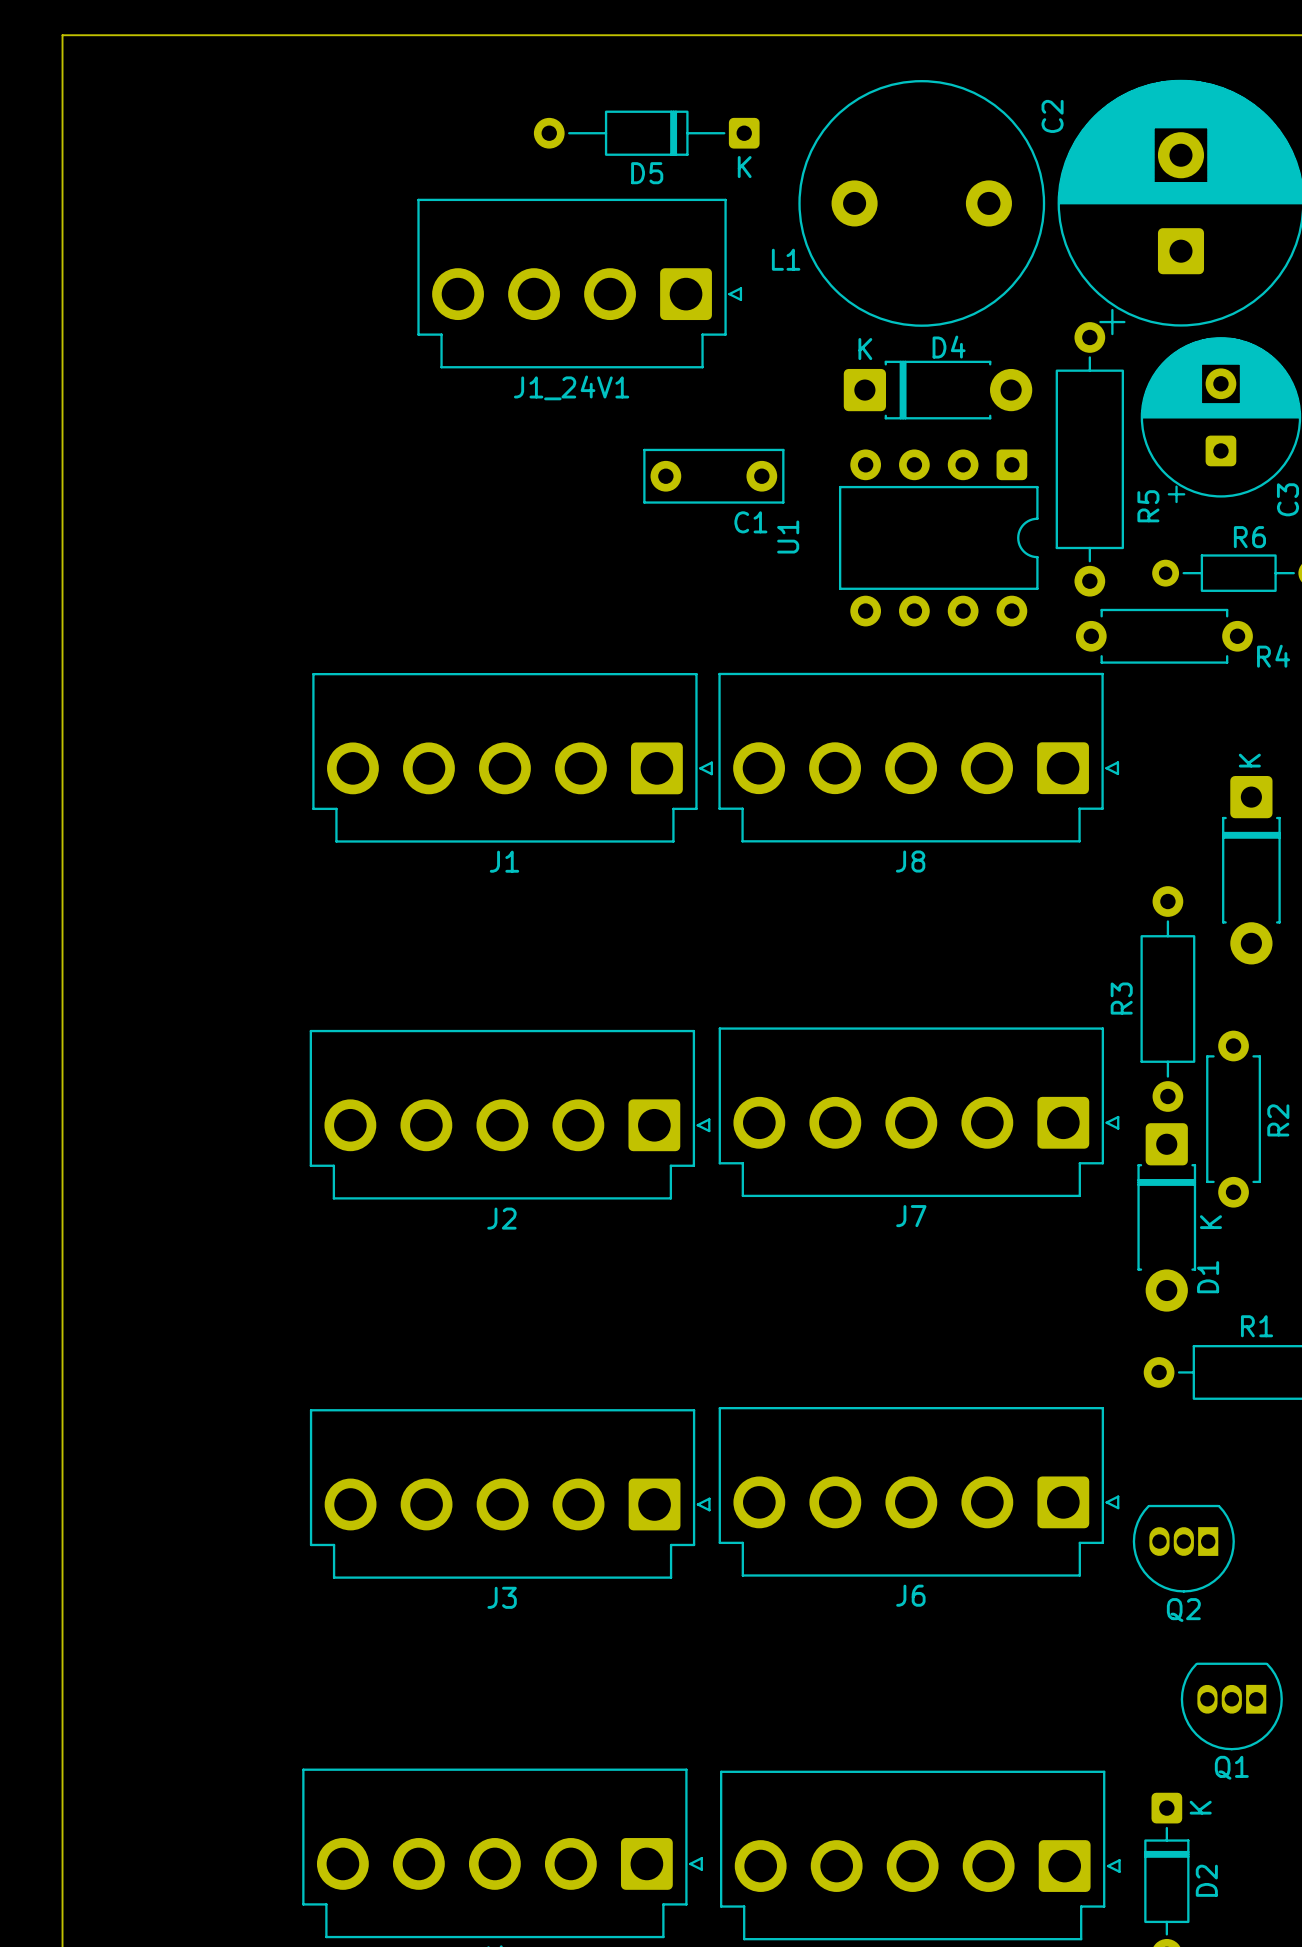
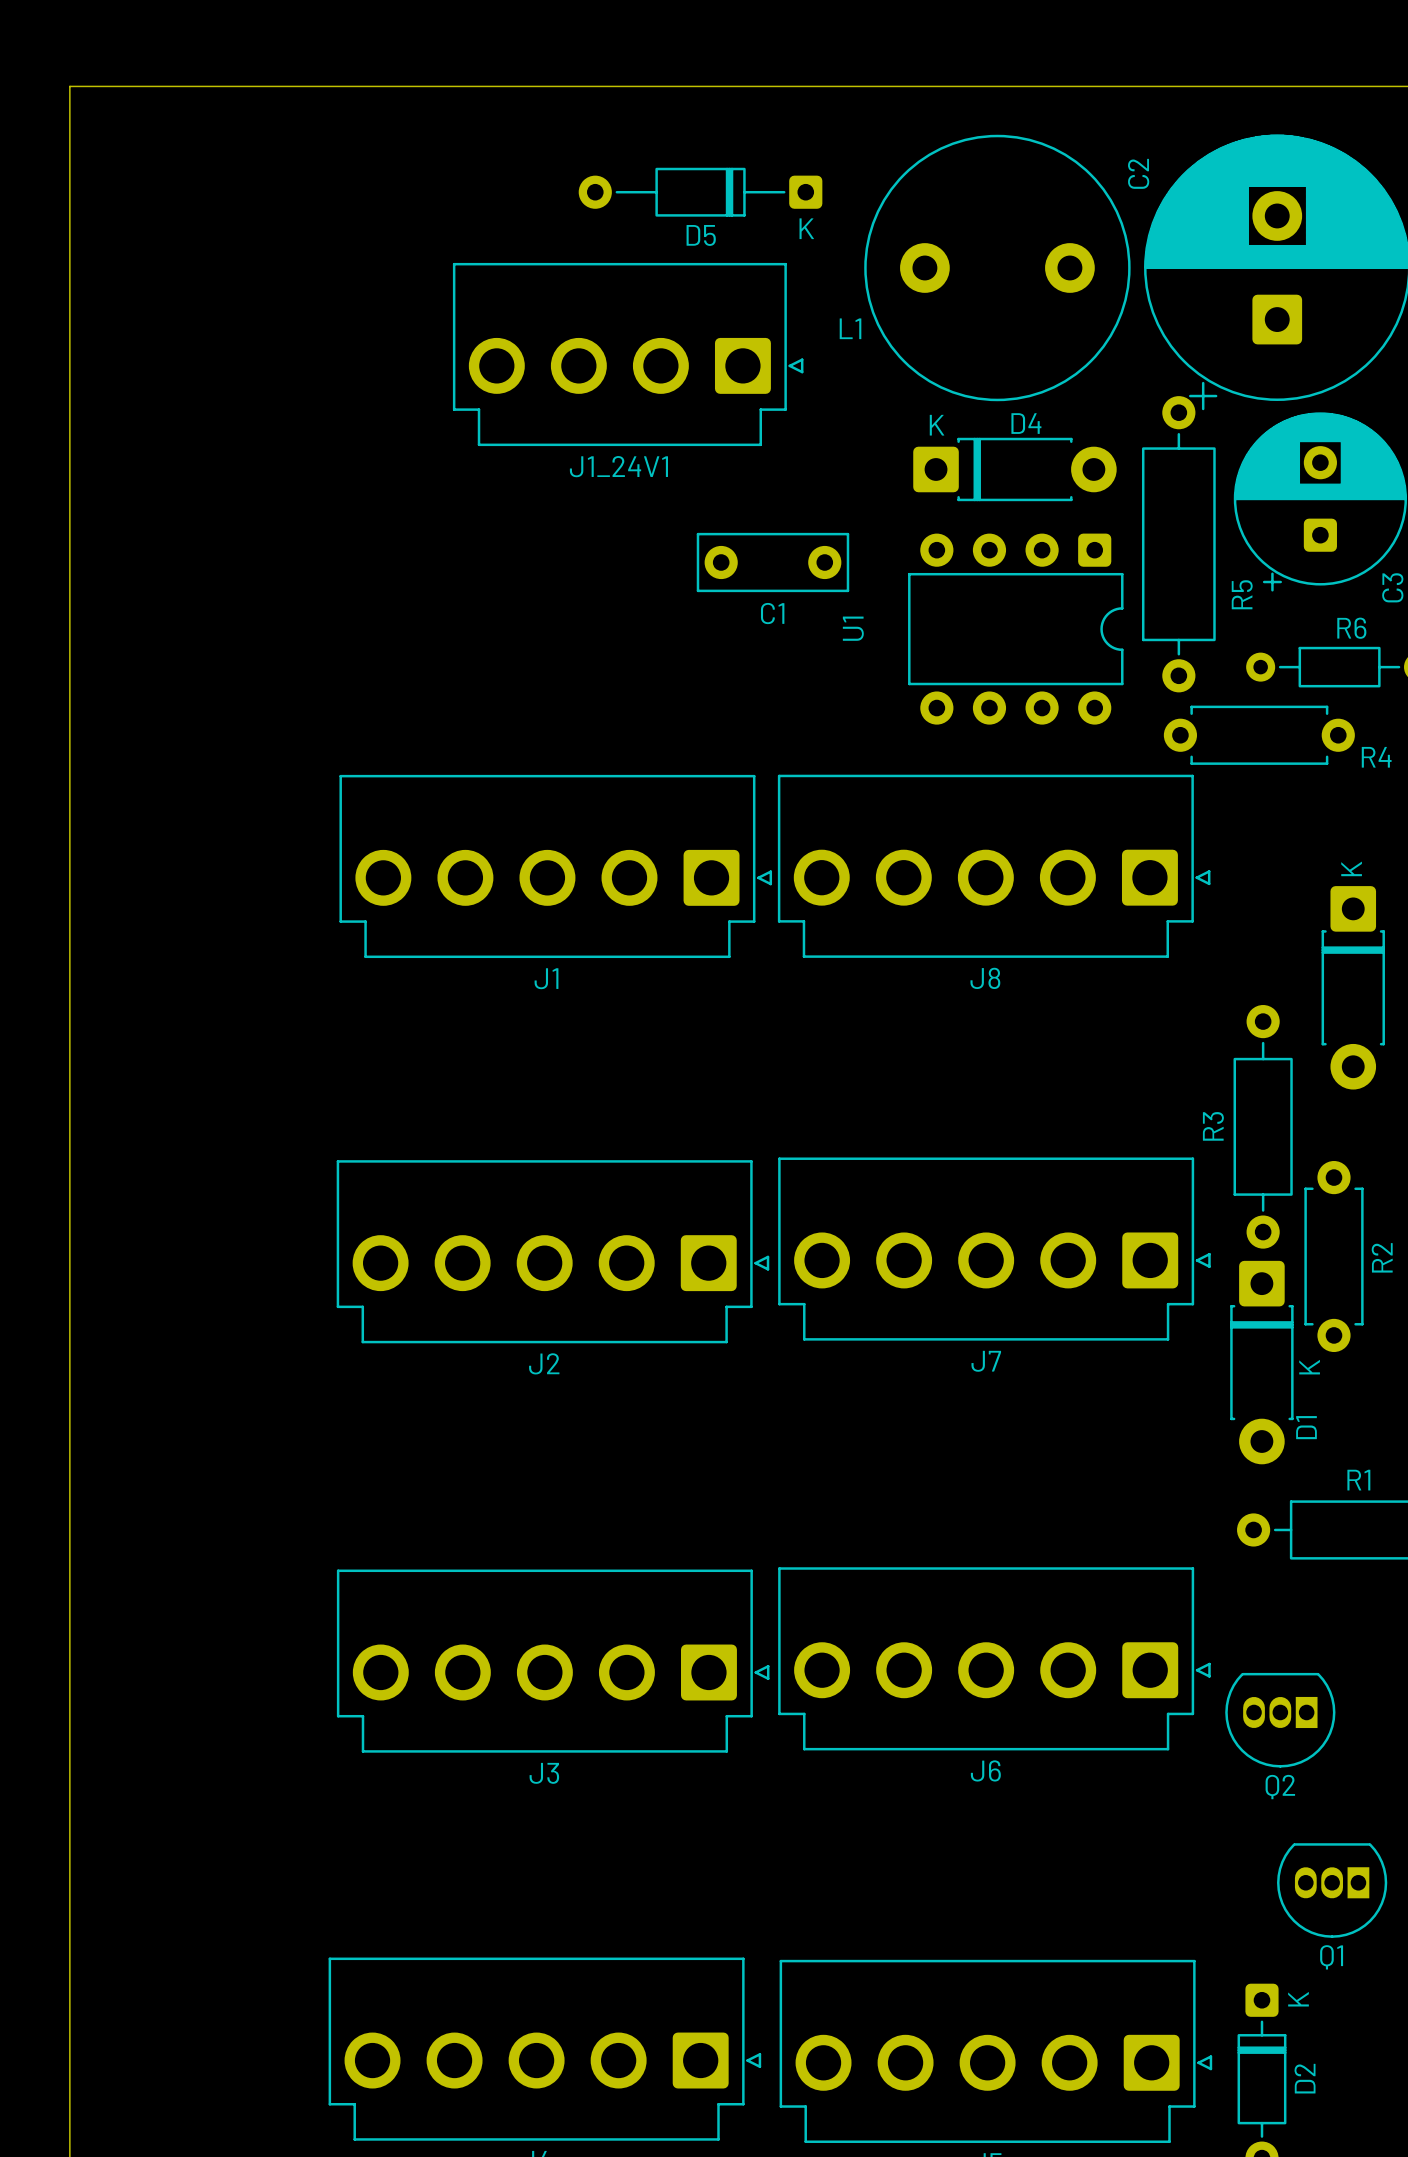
C1 name position: C1 (750, 522) -> C1 (772, 613)

